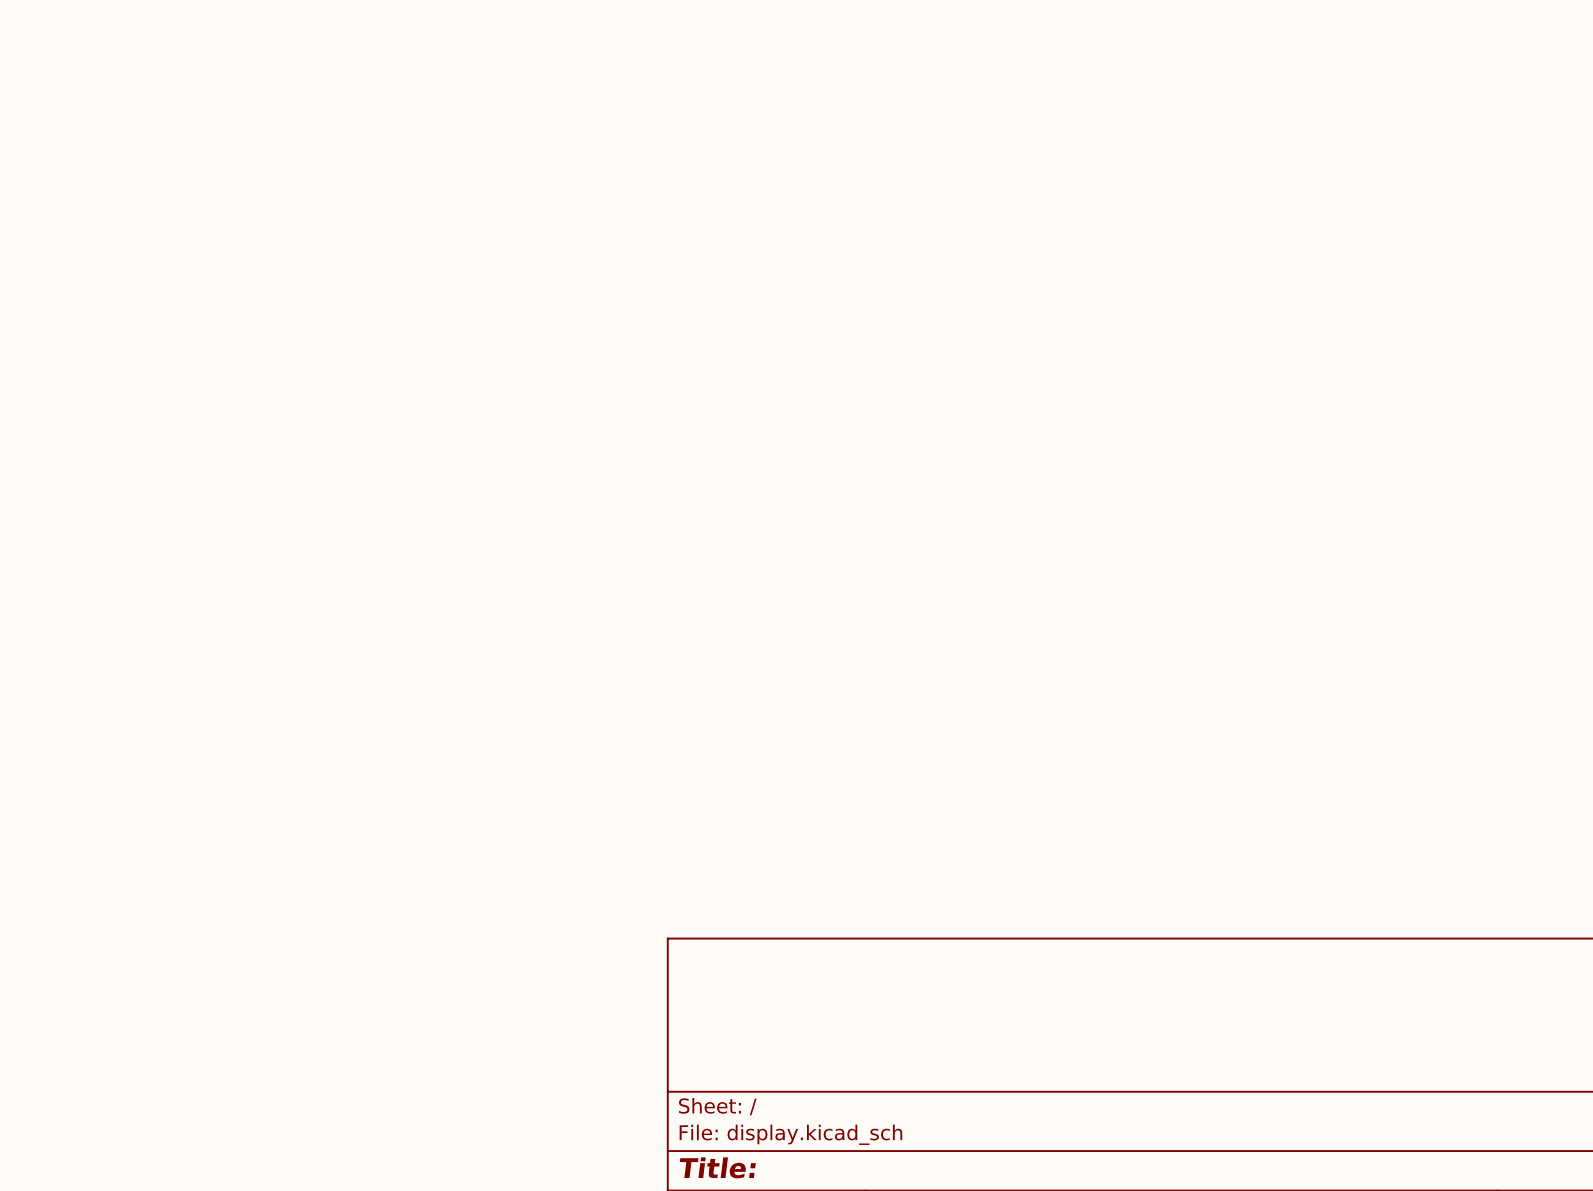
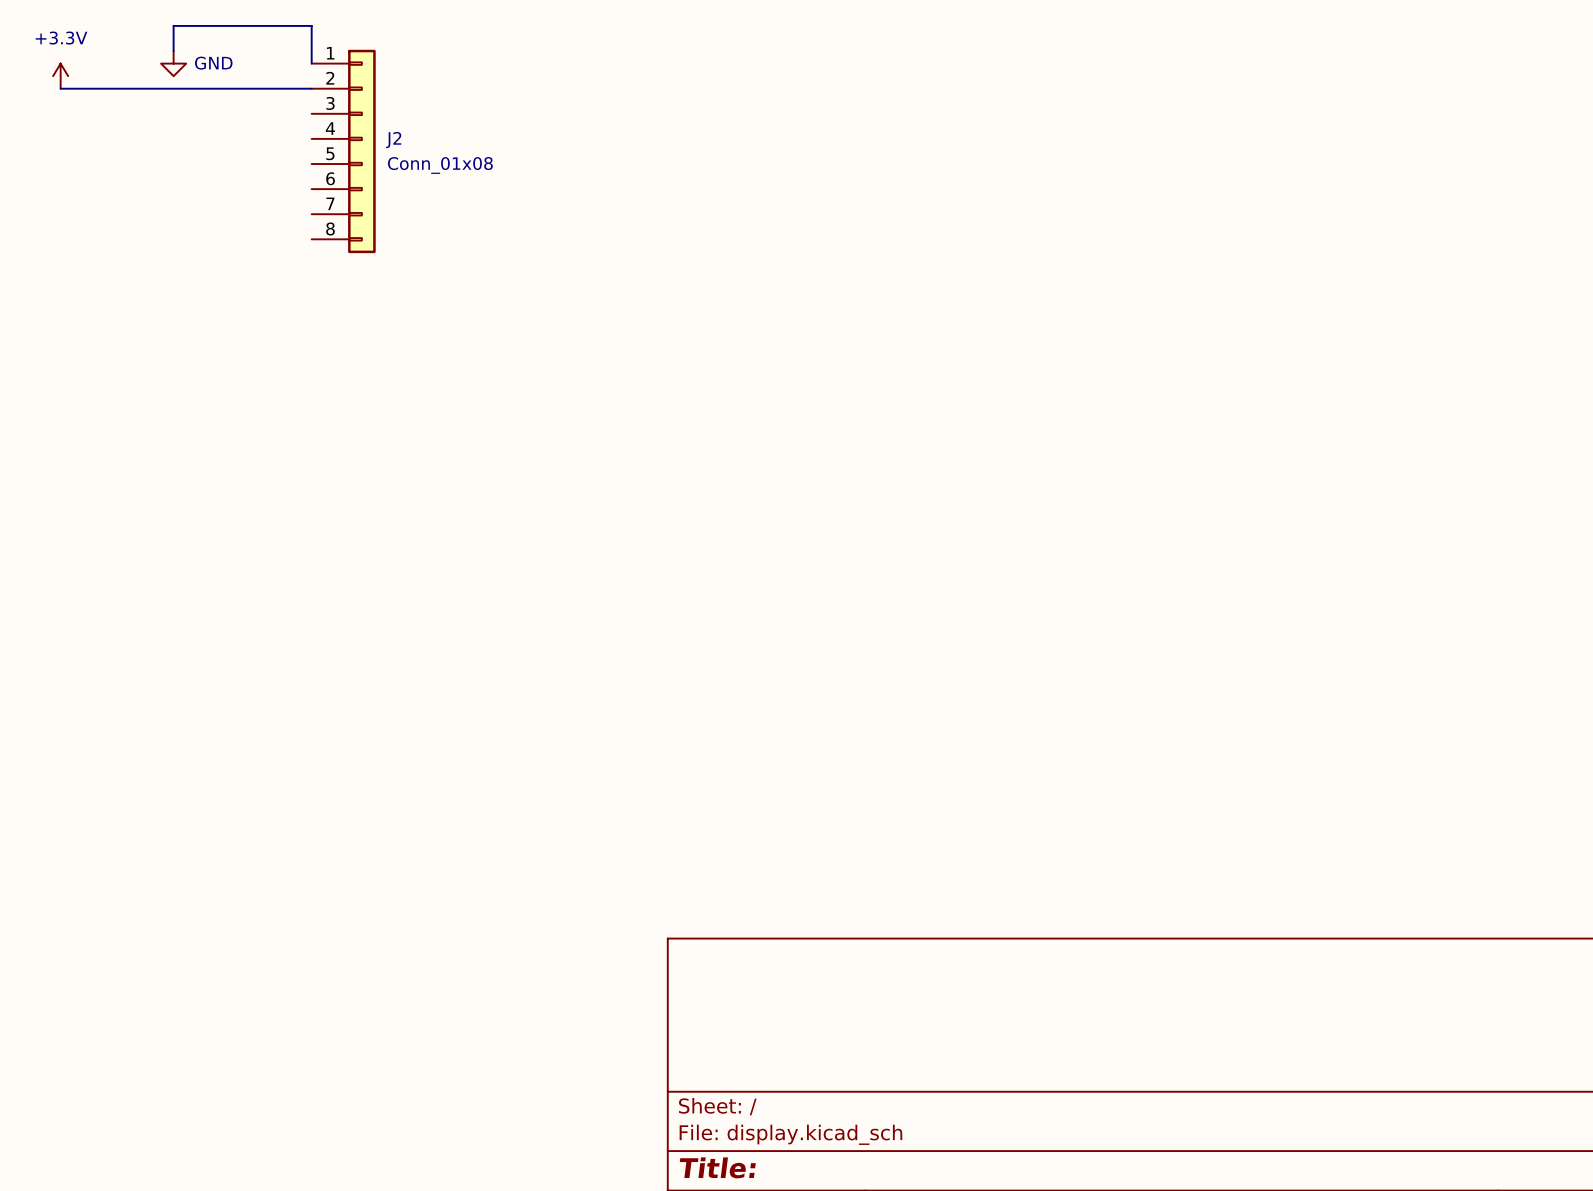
wire: none -> (173, 51) (173, 25) (311, 25) (311, 63)
power symbol: none -> GND (173, 63)
power symbol: none -> +3.3V (60, 76)
wire: none -> (60, 88) (311, 88)
J2: none -> Conn_01x08 (343, 151)

